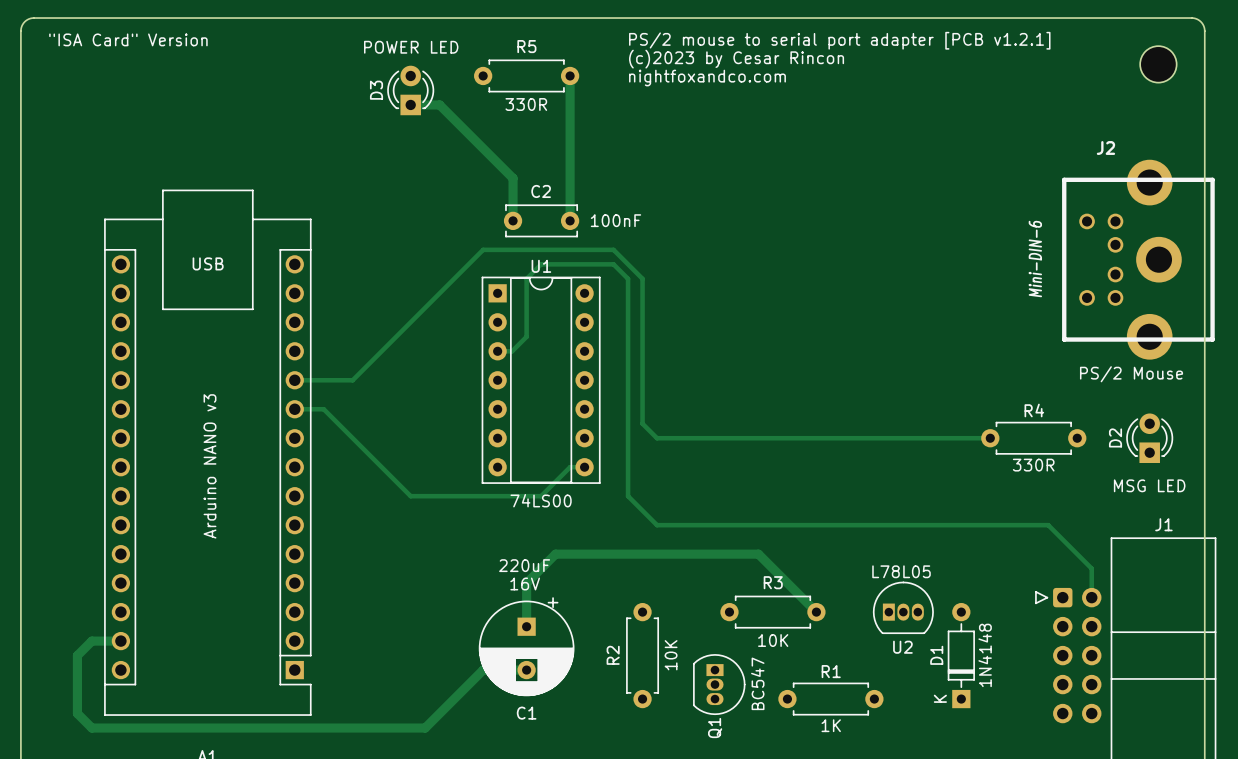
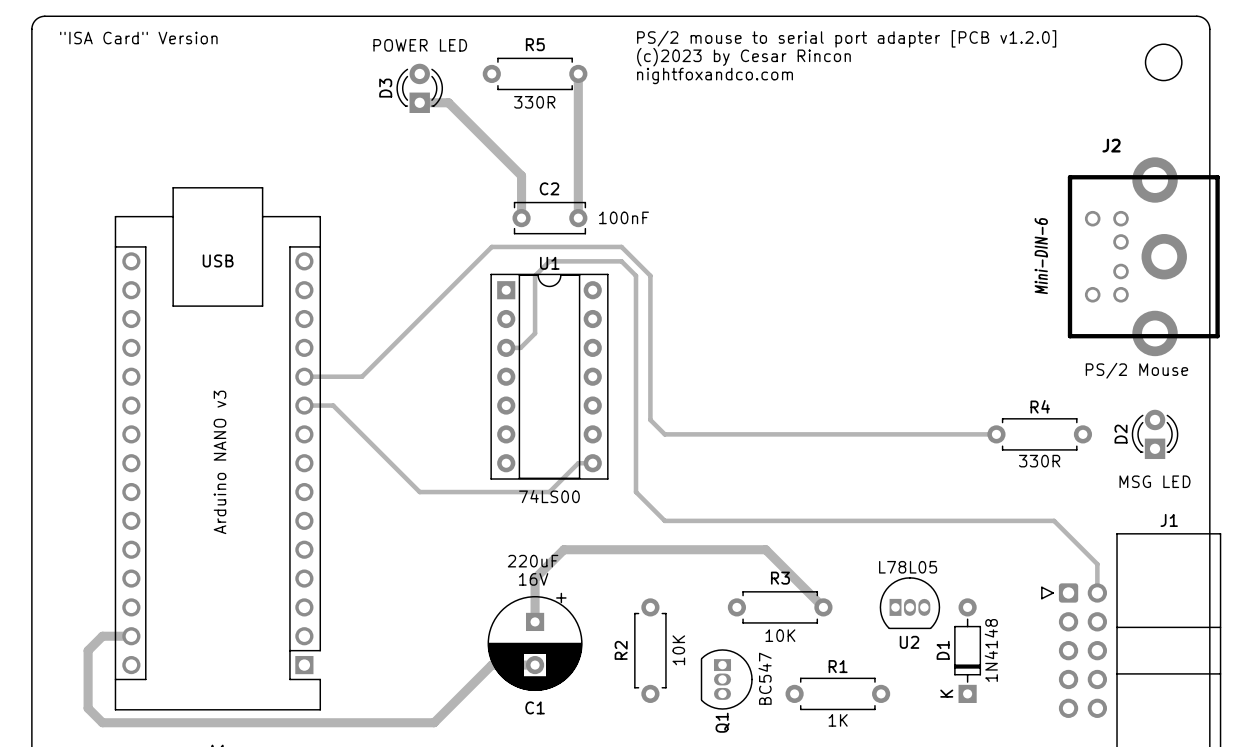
text: PS/2 mouse to serial port adapter [PCB v1.2.1] (839, 40) -> PS/2 mouse to serial port adapter [PCB v1.2.0] (846, 38)

